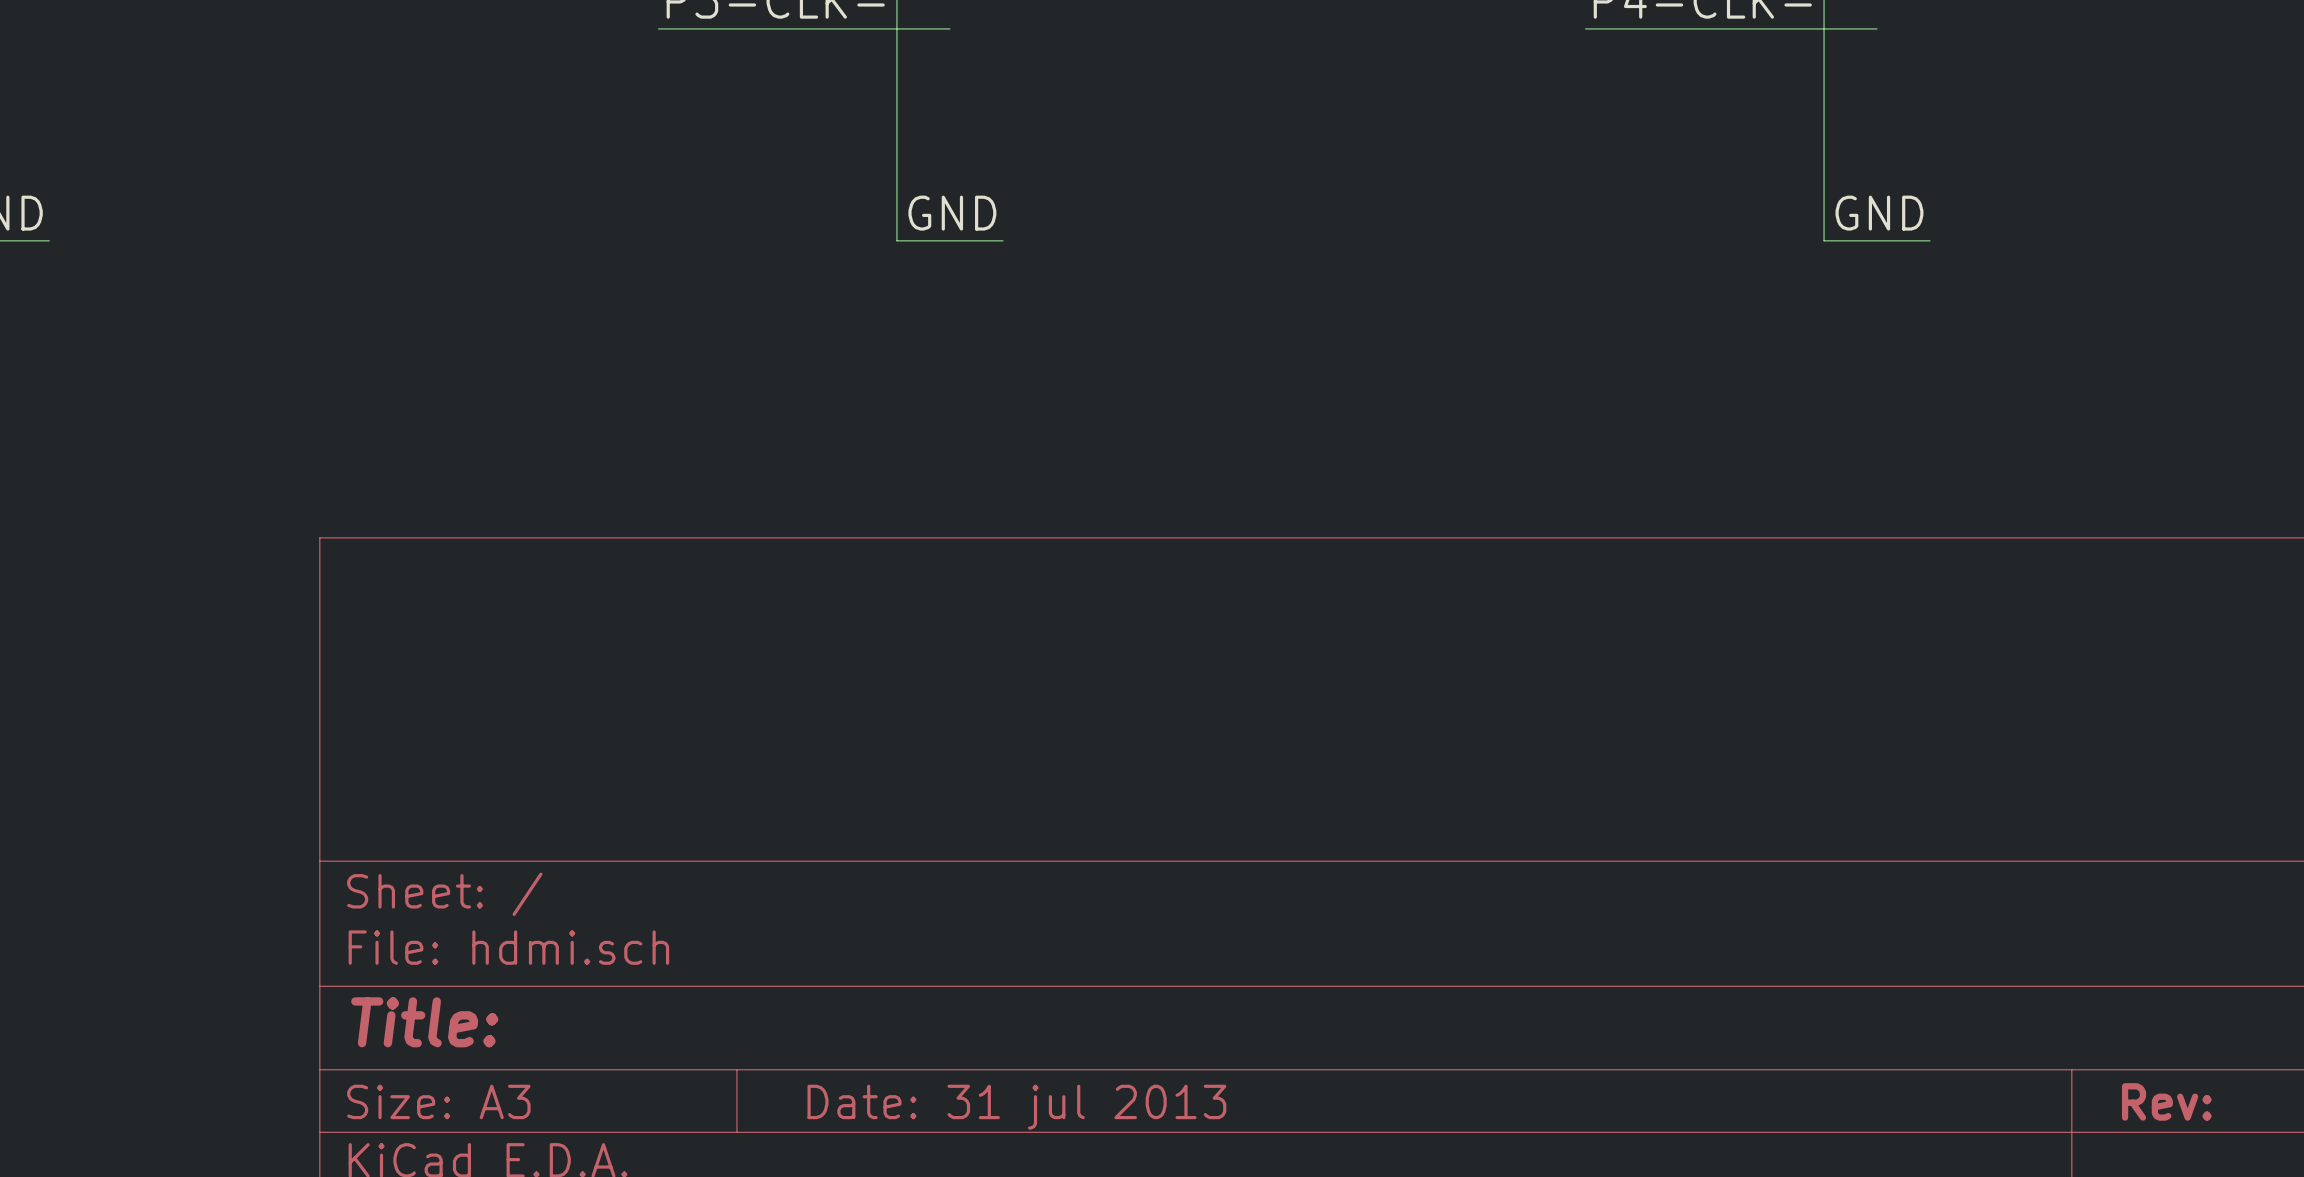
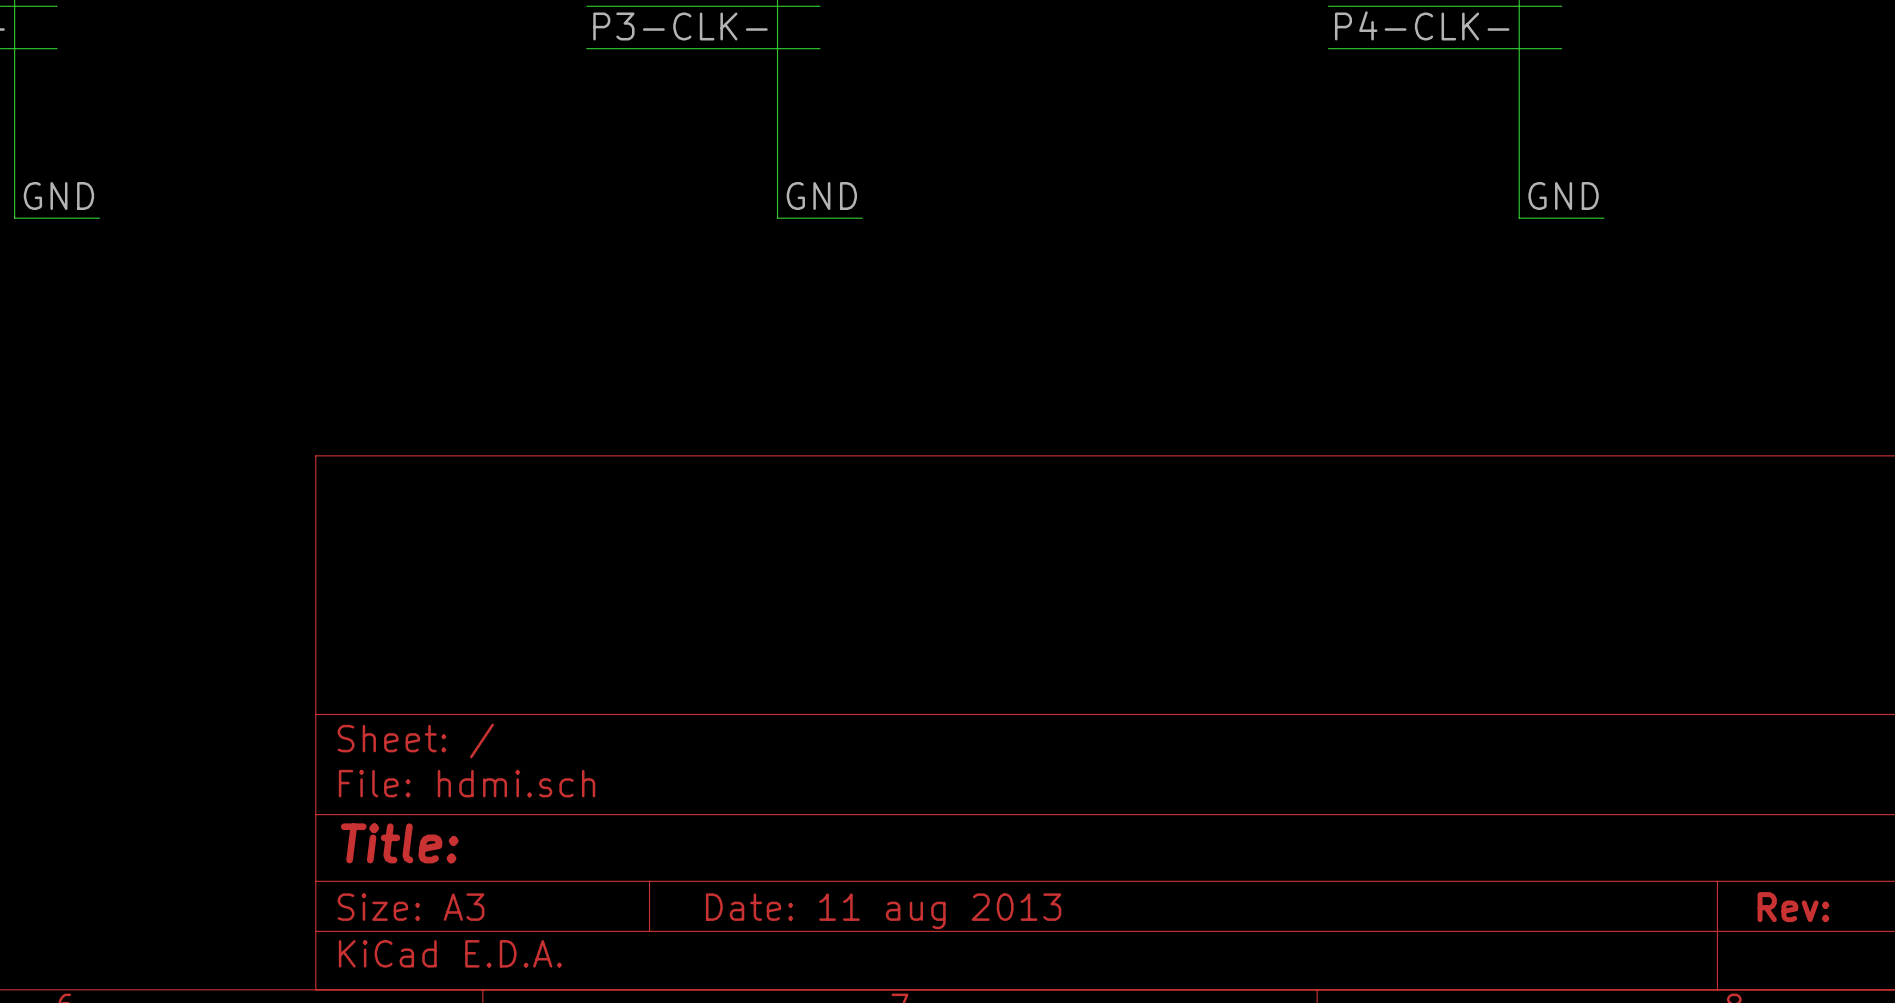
title block: Date: 31 jul 2013 (1016, 1107) -> Date: 11 aug 2013 (883, 911)

